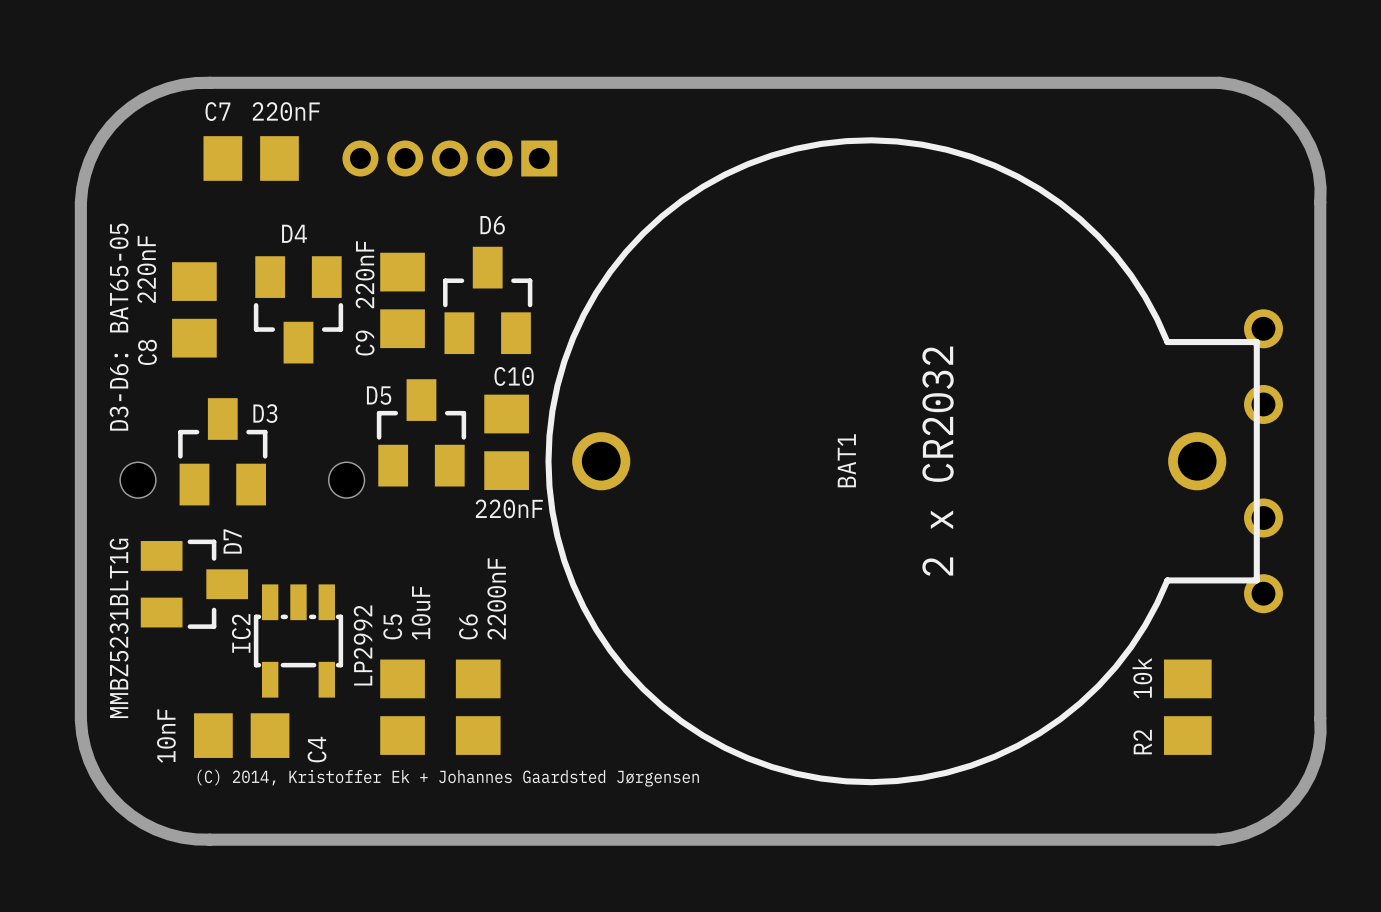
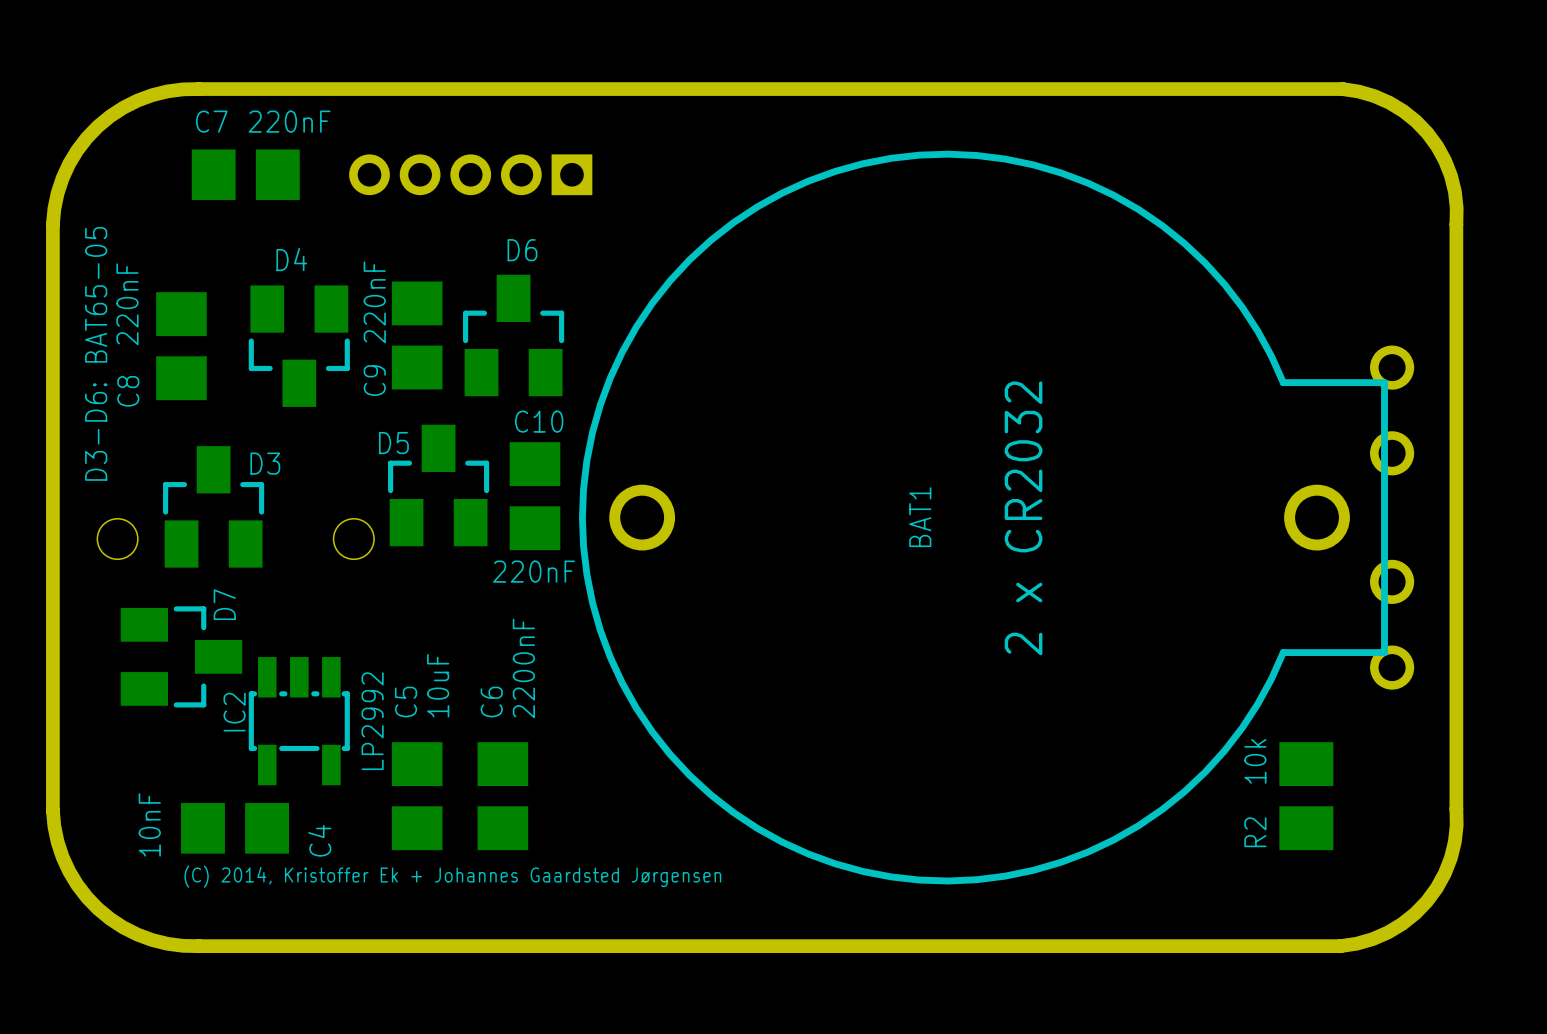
D7 value: MMBZ5231BLT1G (119, 628) -> none

